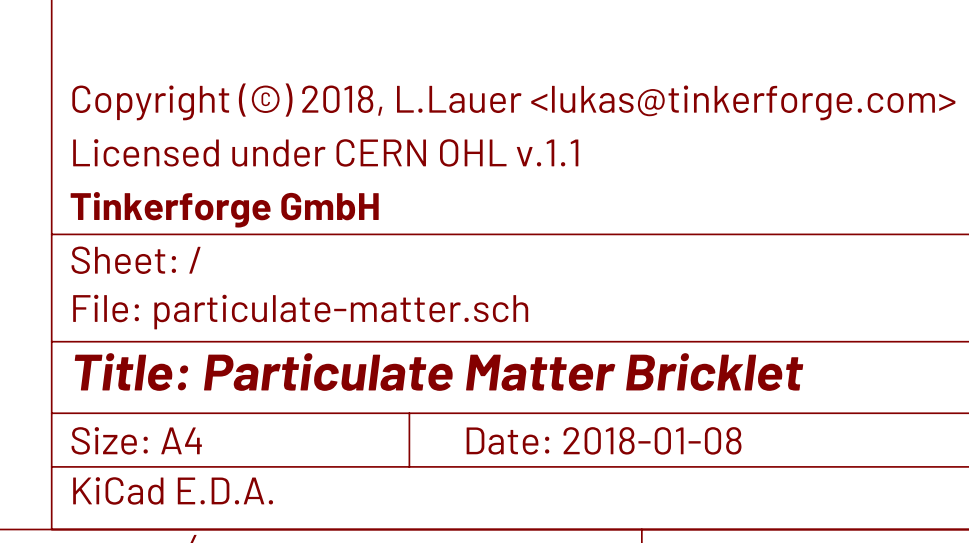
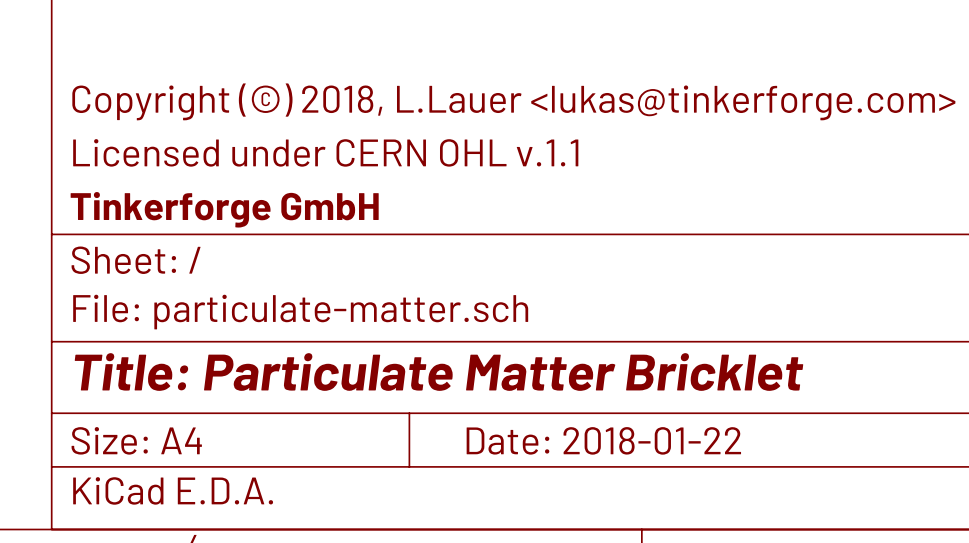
title block: Date: 2018-01-08 (604, 440) -> Date: 2018-01-22 (603, 440)

